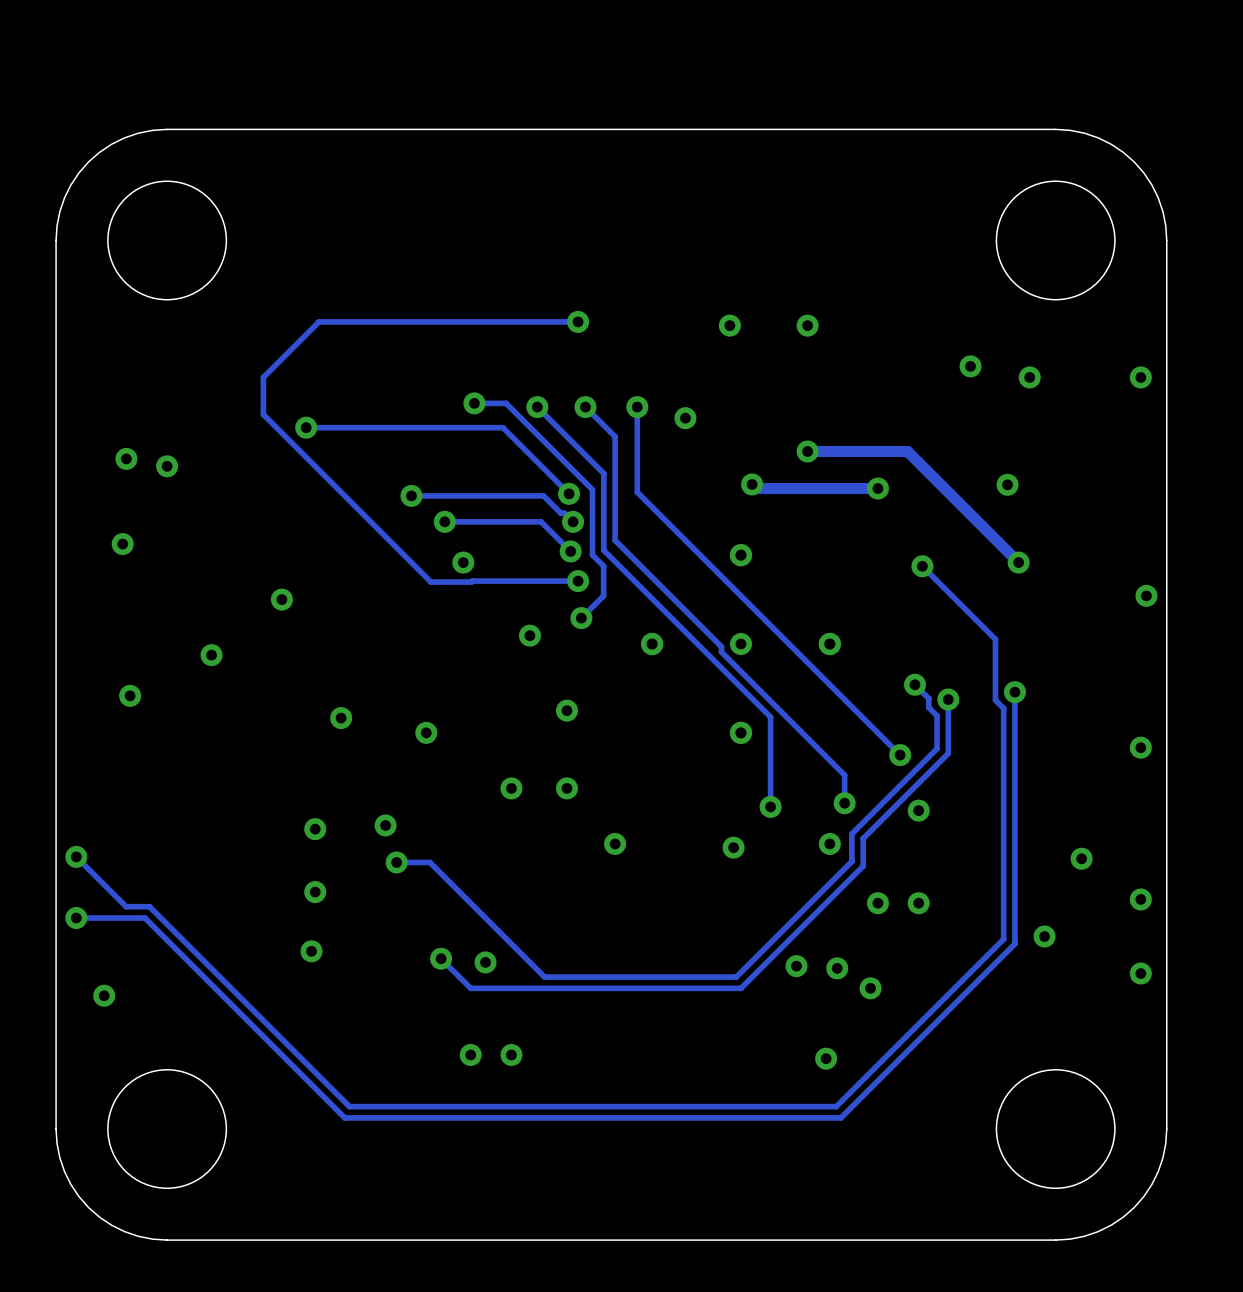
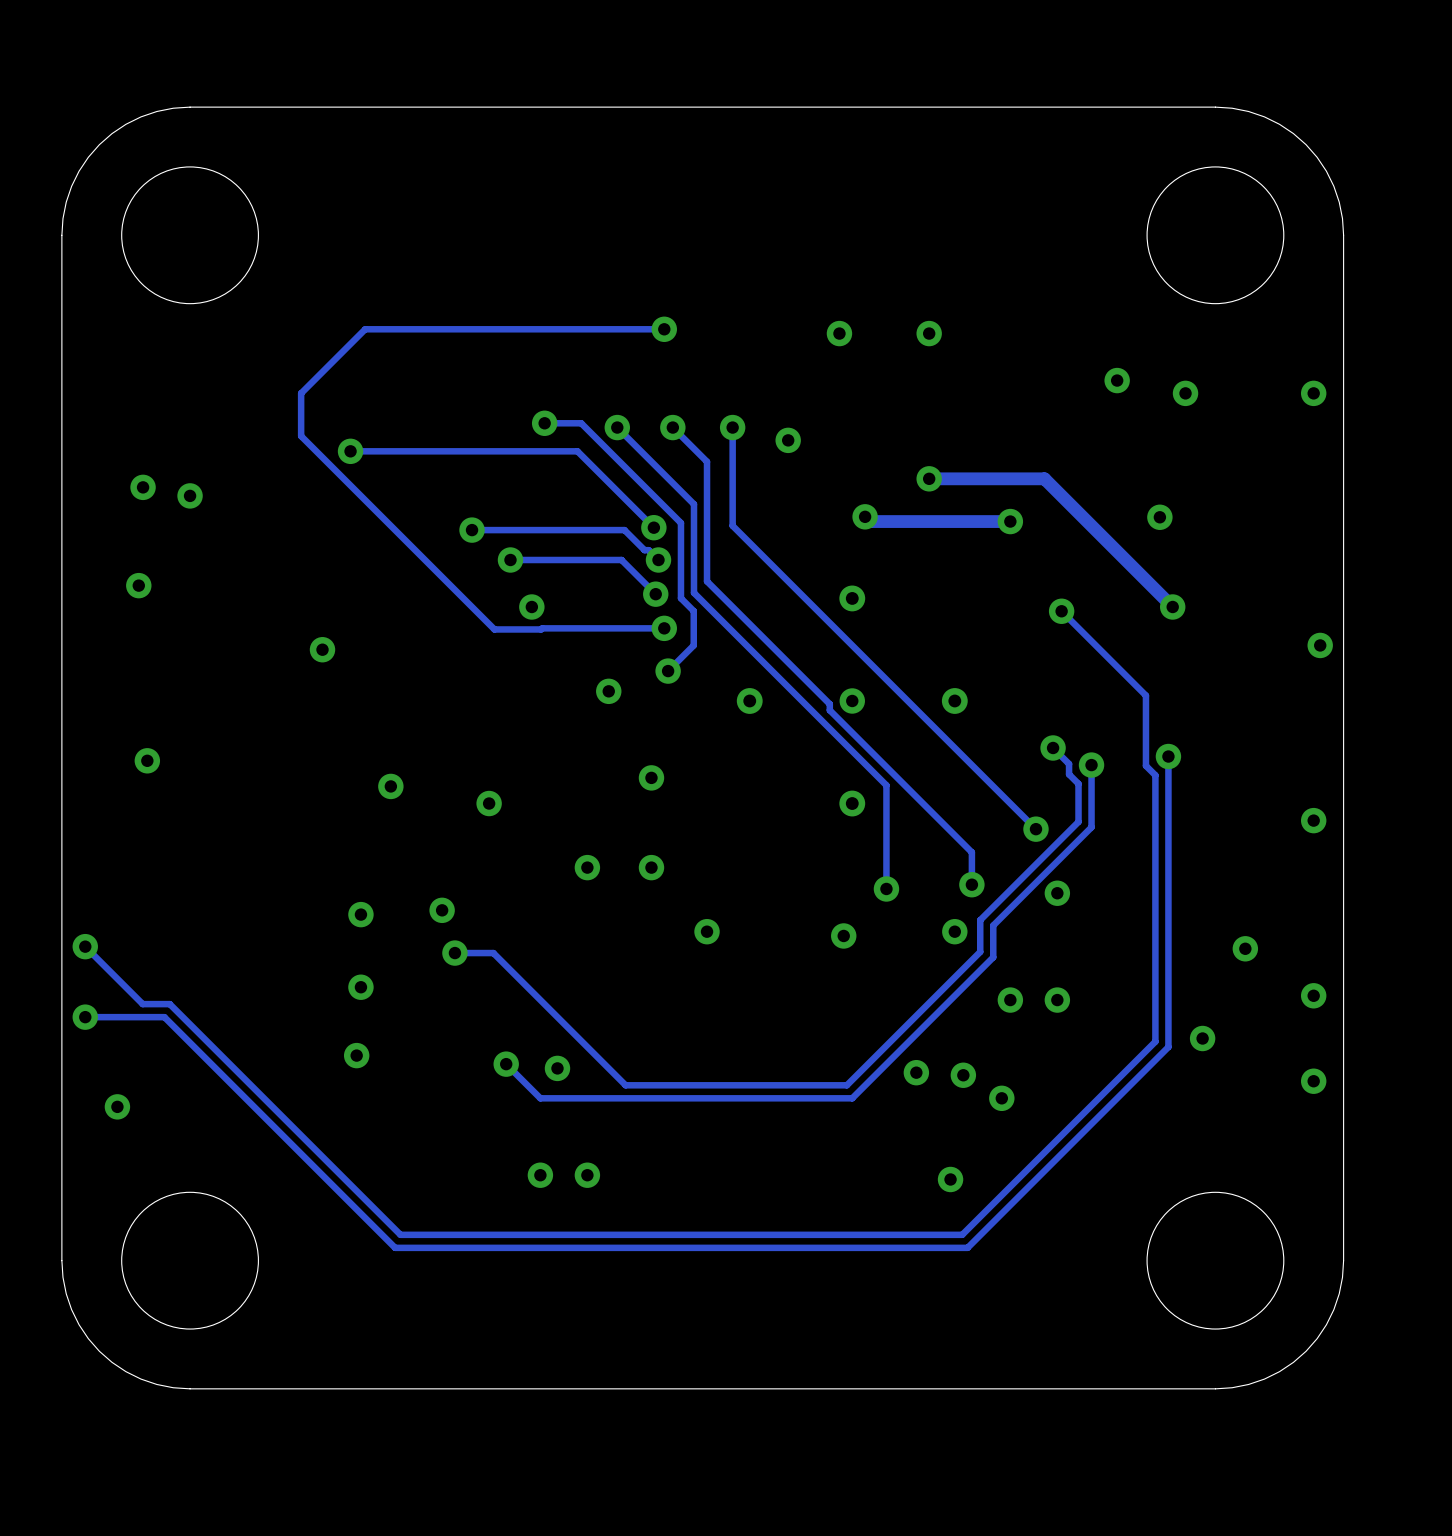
via: (211, 655) -> none

